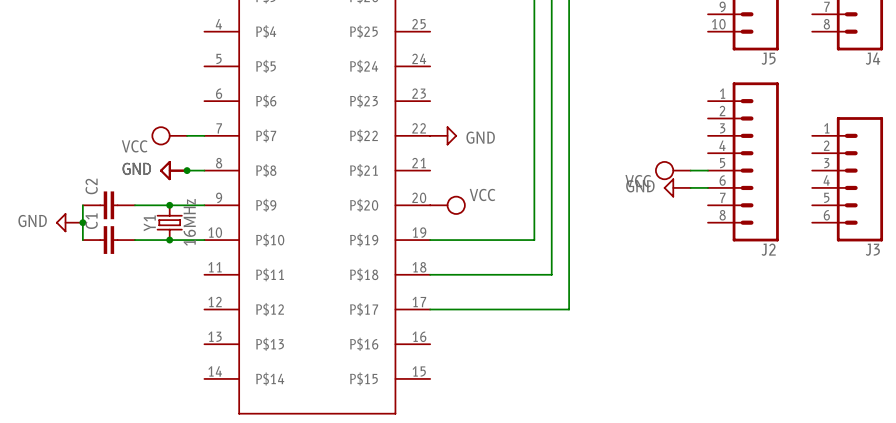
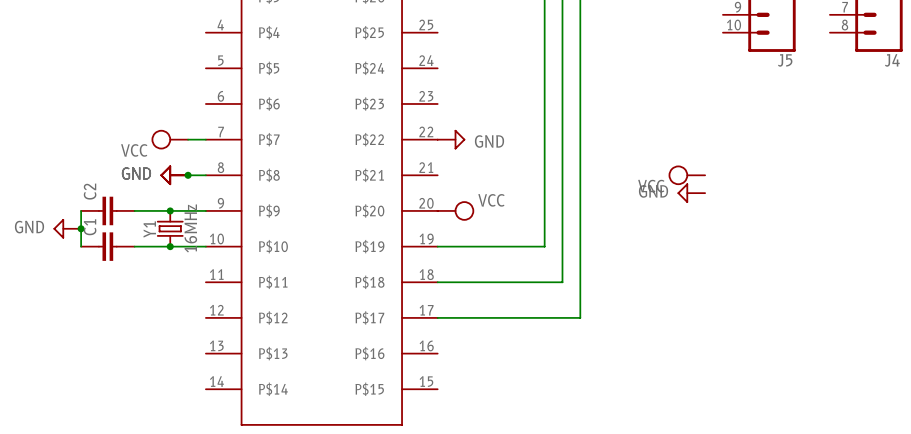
J2: (743, 161) -> none
wire: (690, 170) (708, 170) -> none
J3: (847, 179) -> none
wire: (690, 187) (708, 187) -> none

